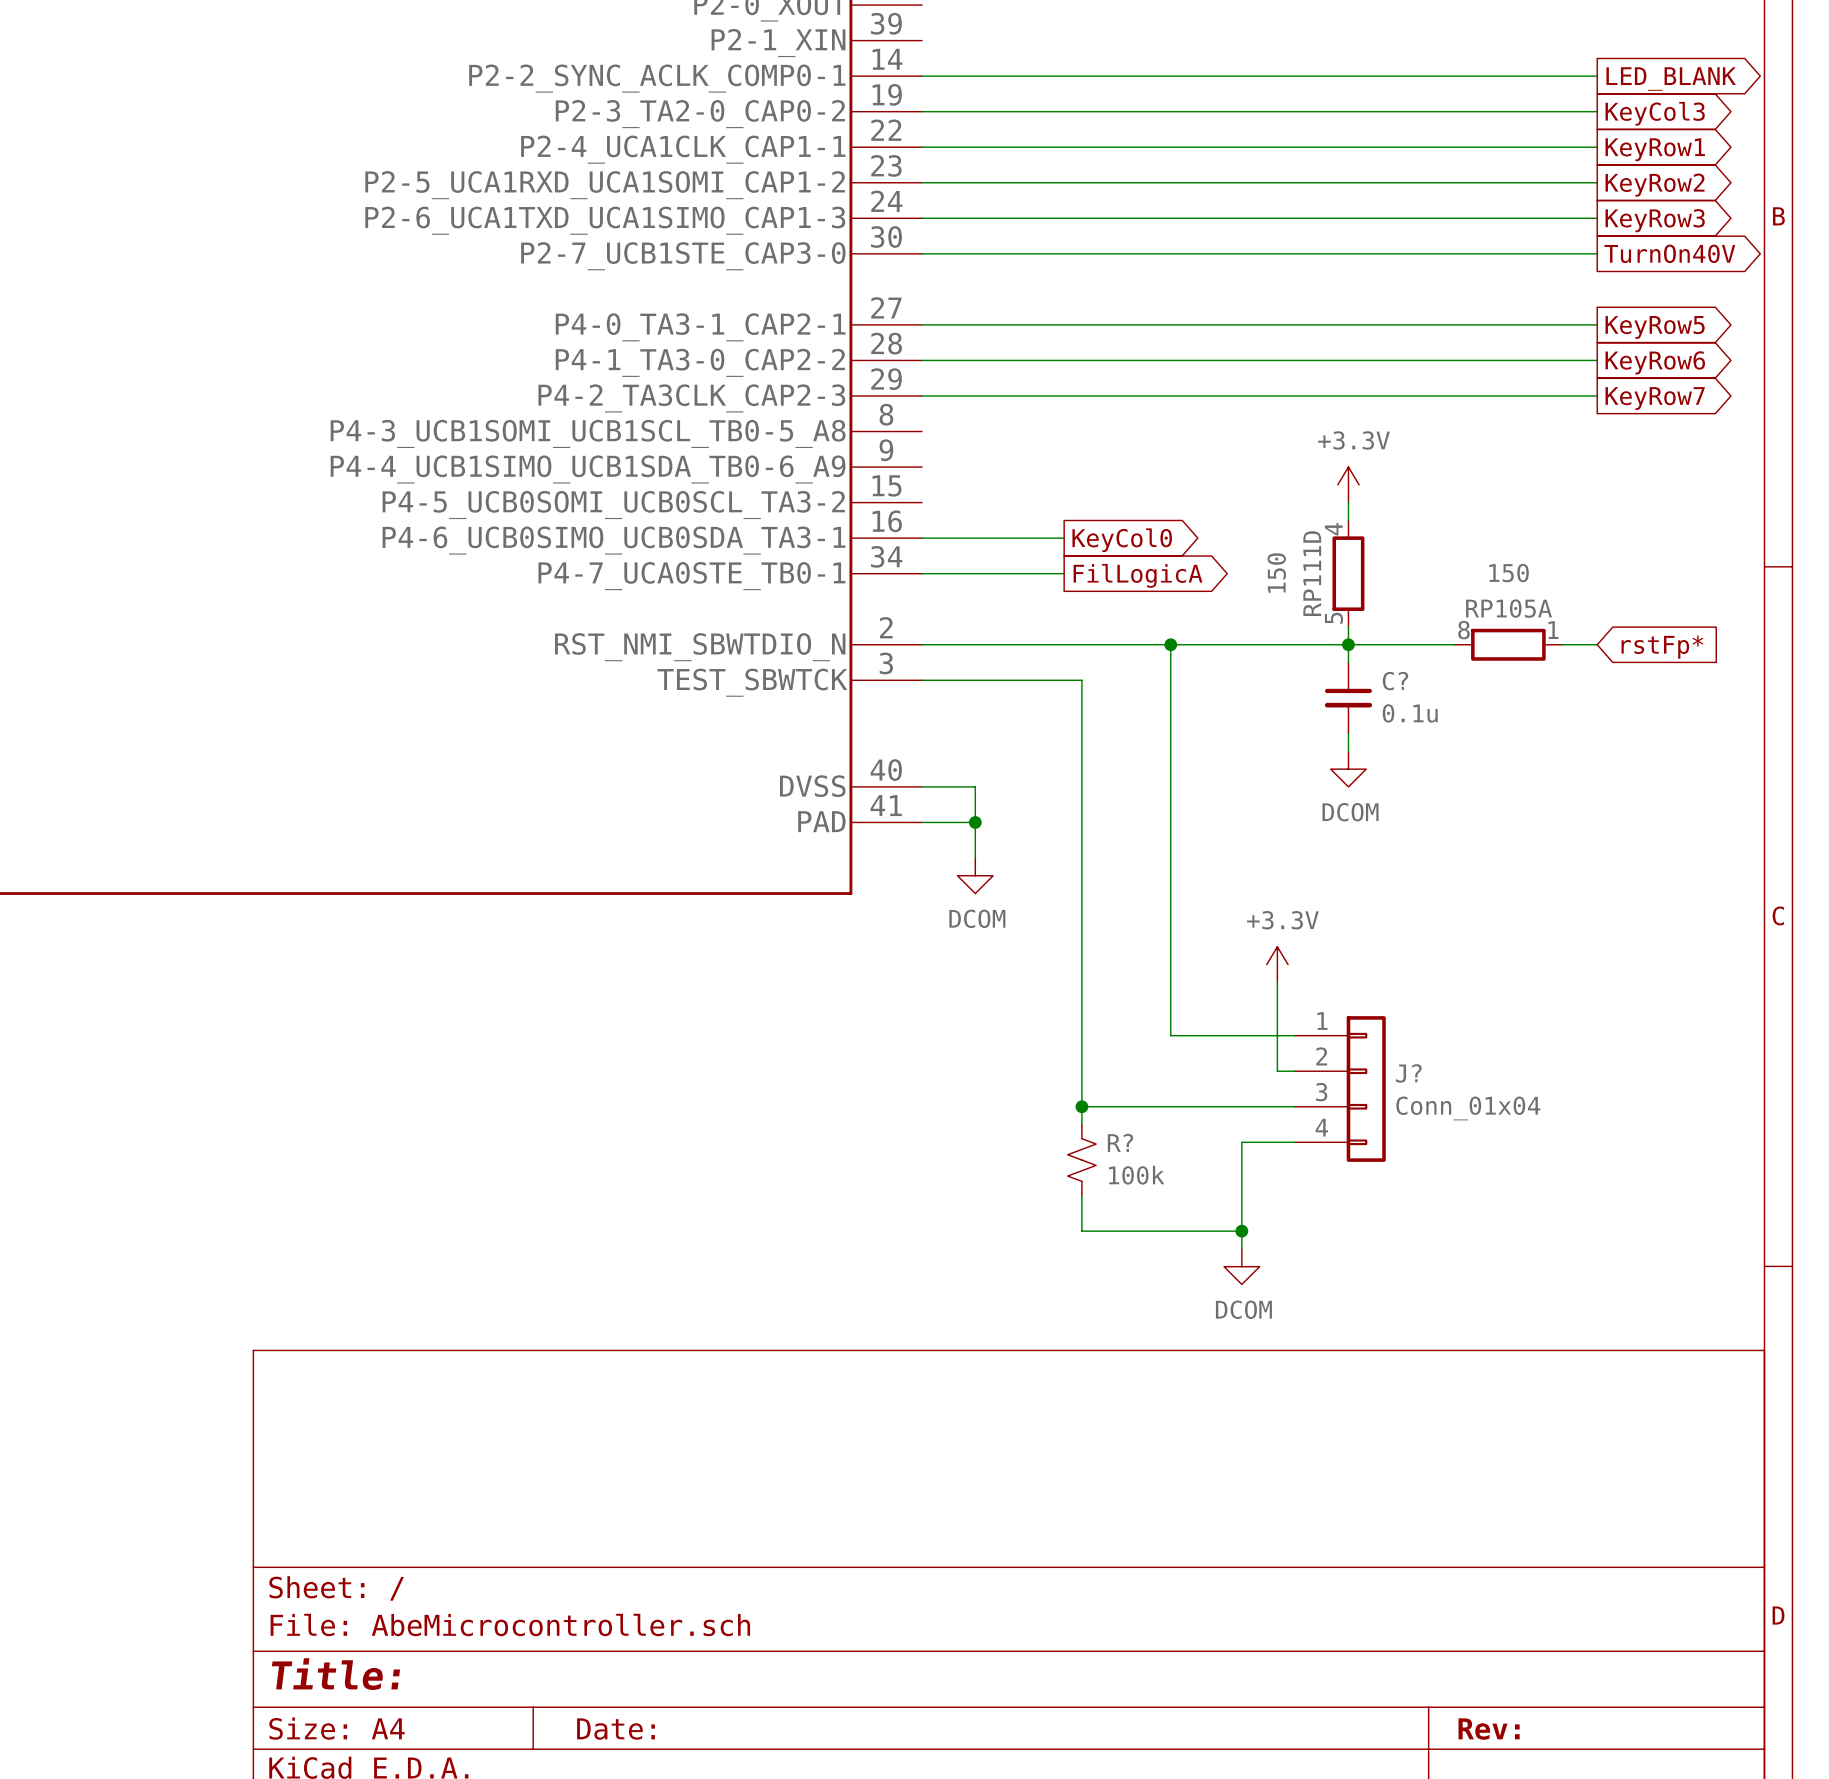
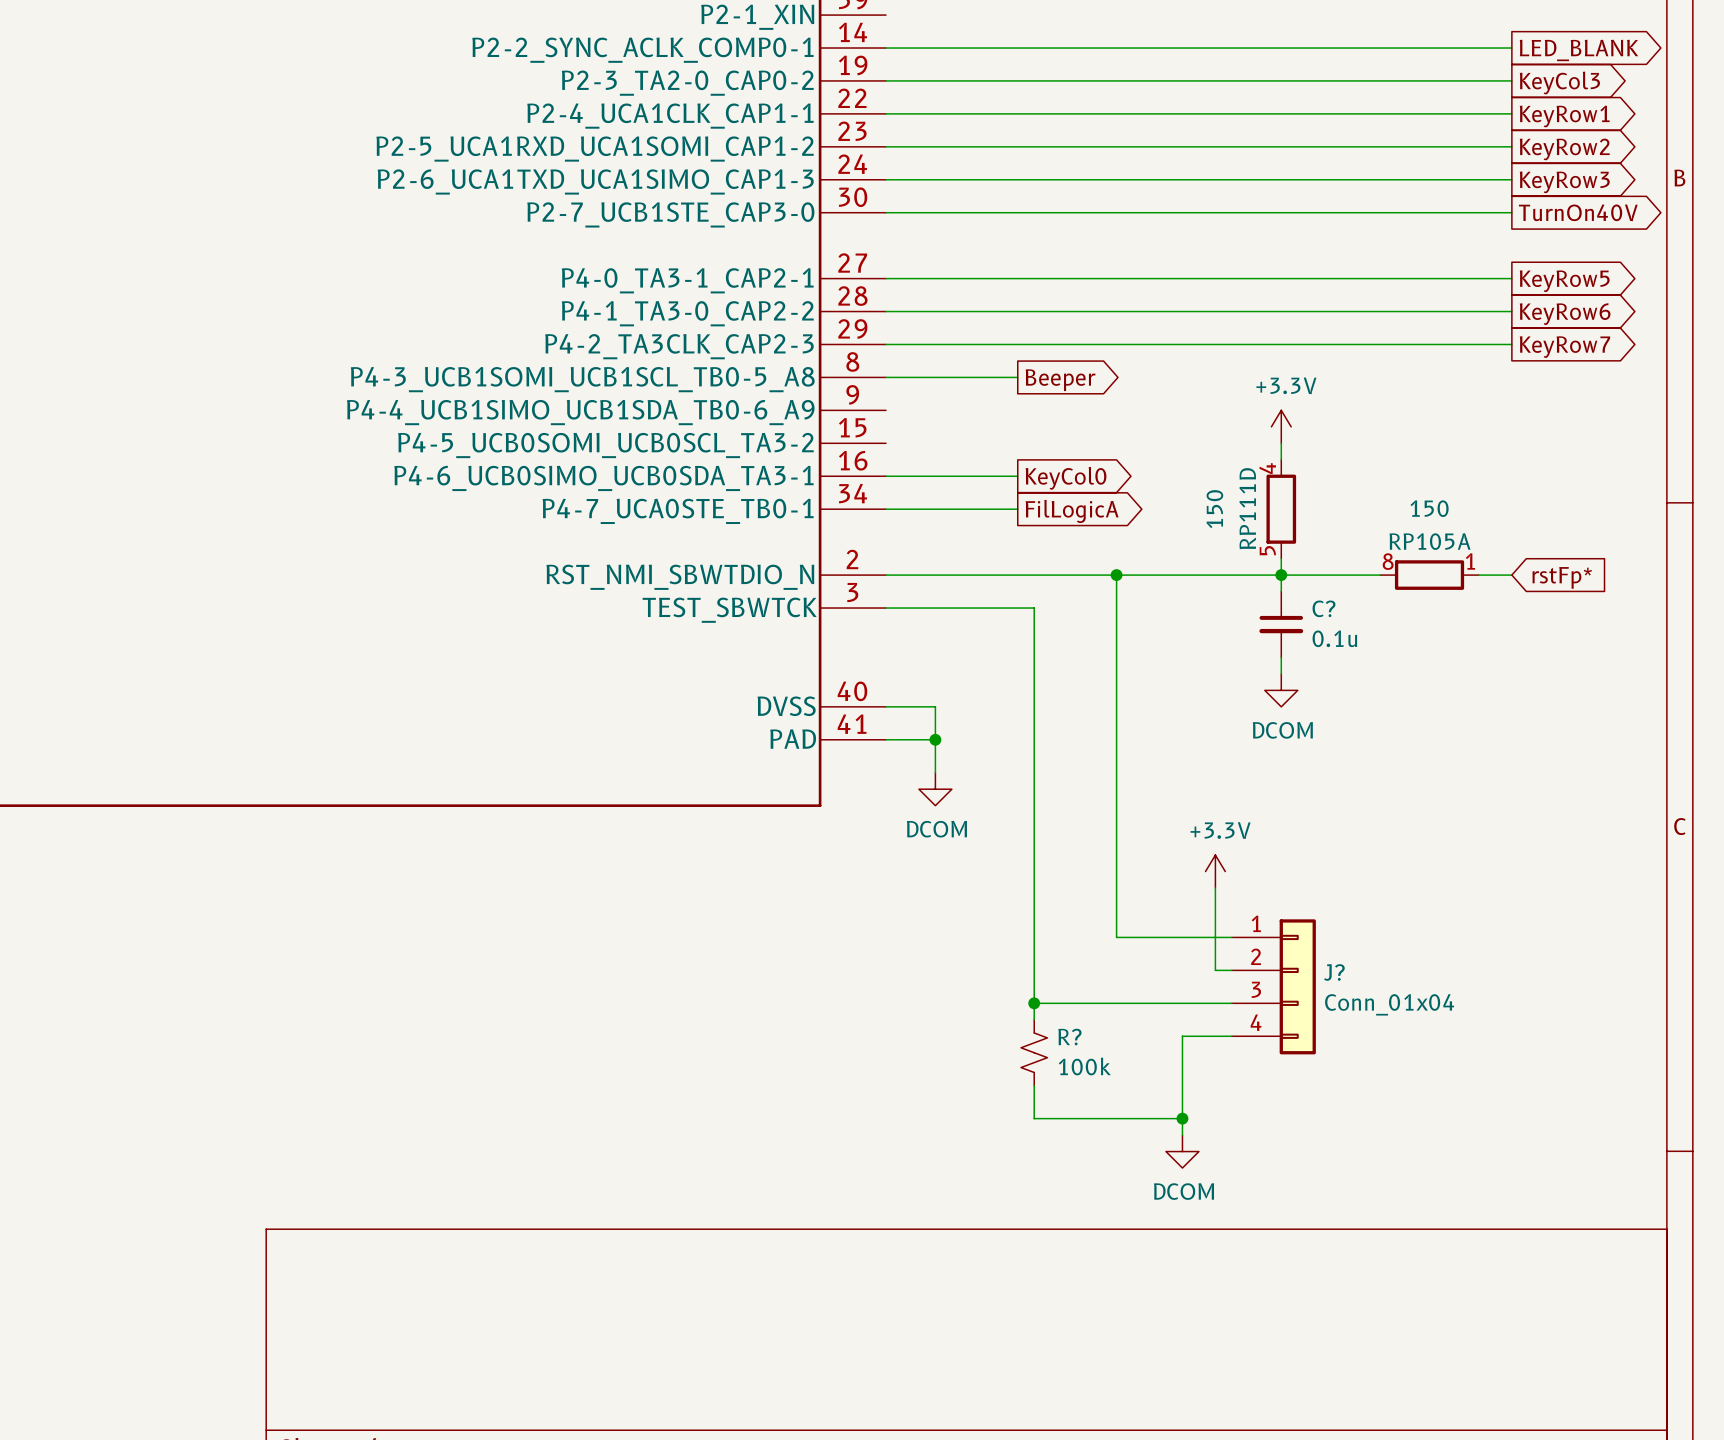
wire: none -> (885, 377) (1017, 377)
global label: none -> Beeper (1060, 380)

